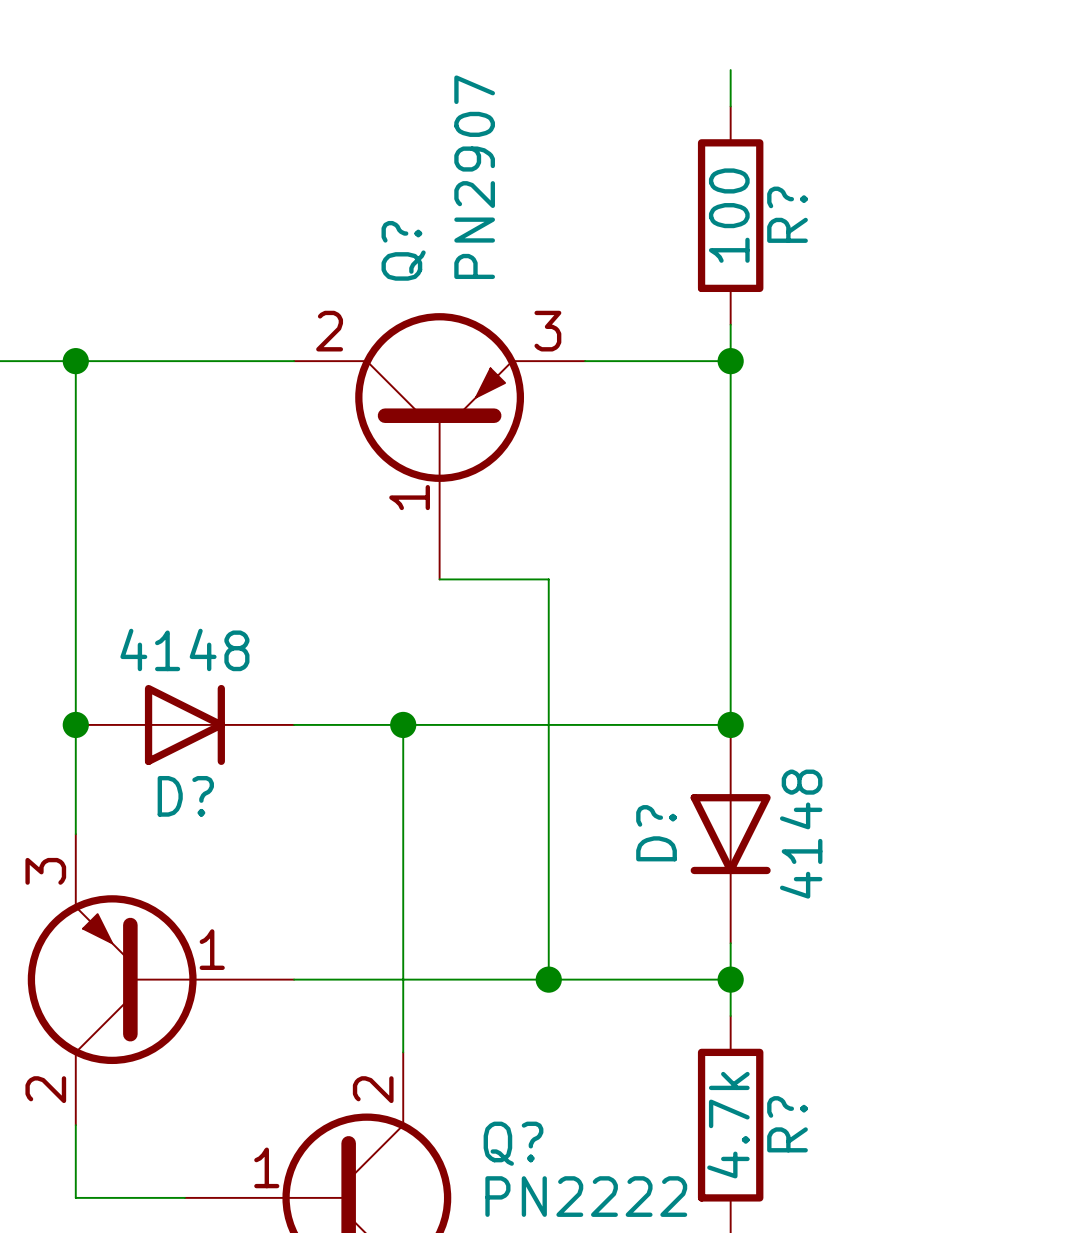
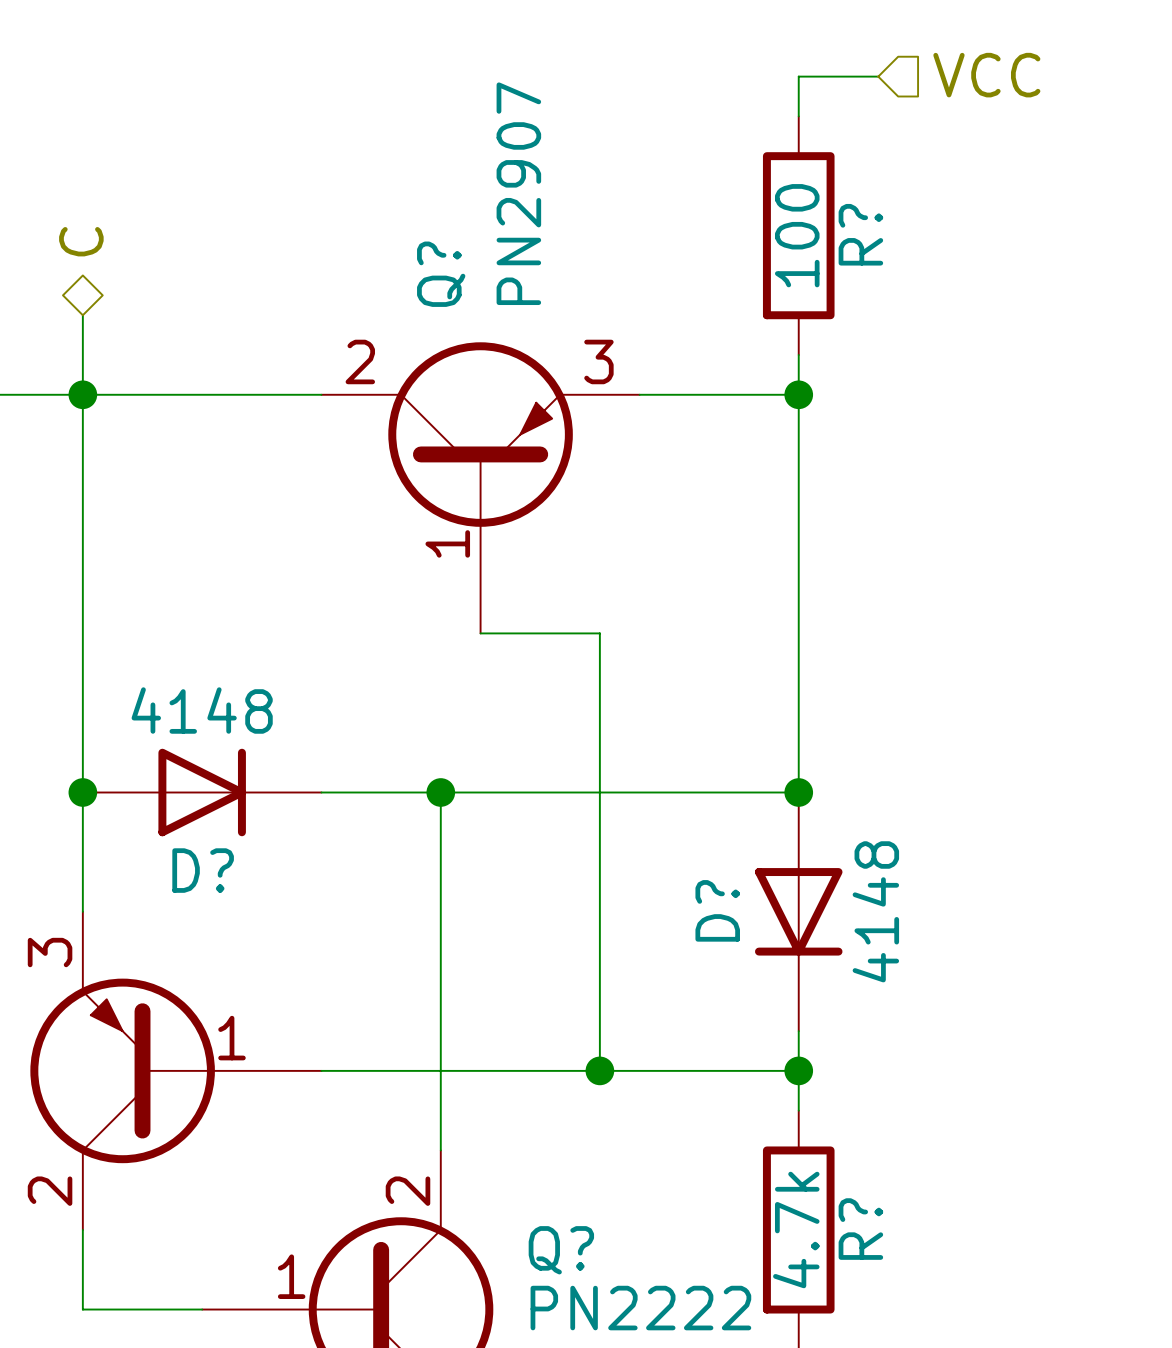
hierarchical label: none -> VCC (986, 75)
wire: none -> (798, 76) (878, 76)
hierarchical label: none -> C (81, 241)
wire: none -> (82, 315) (82, 394)

